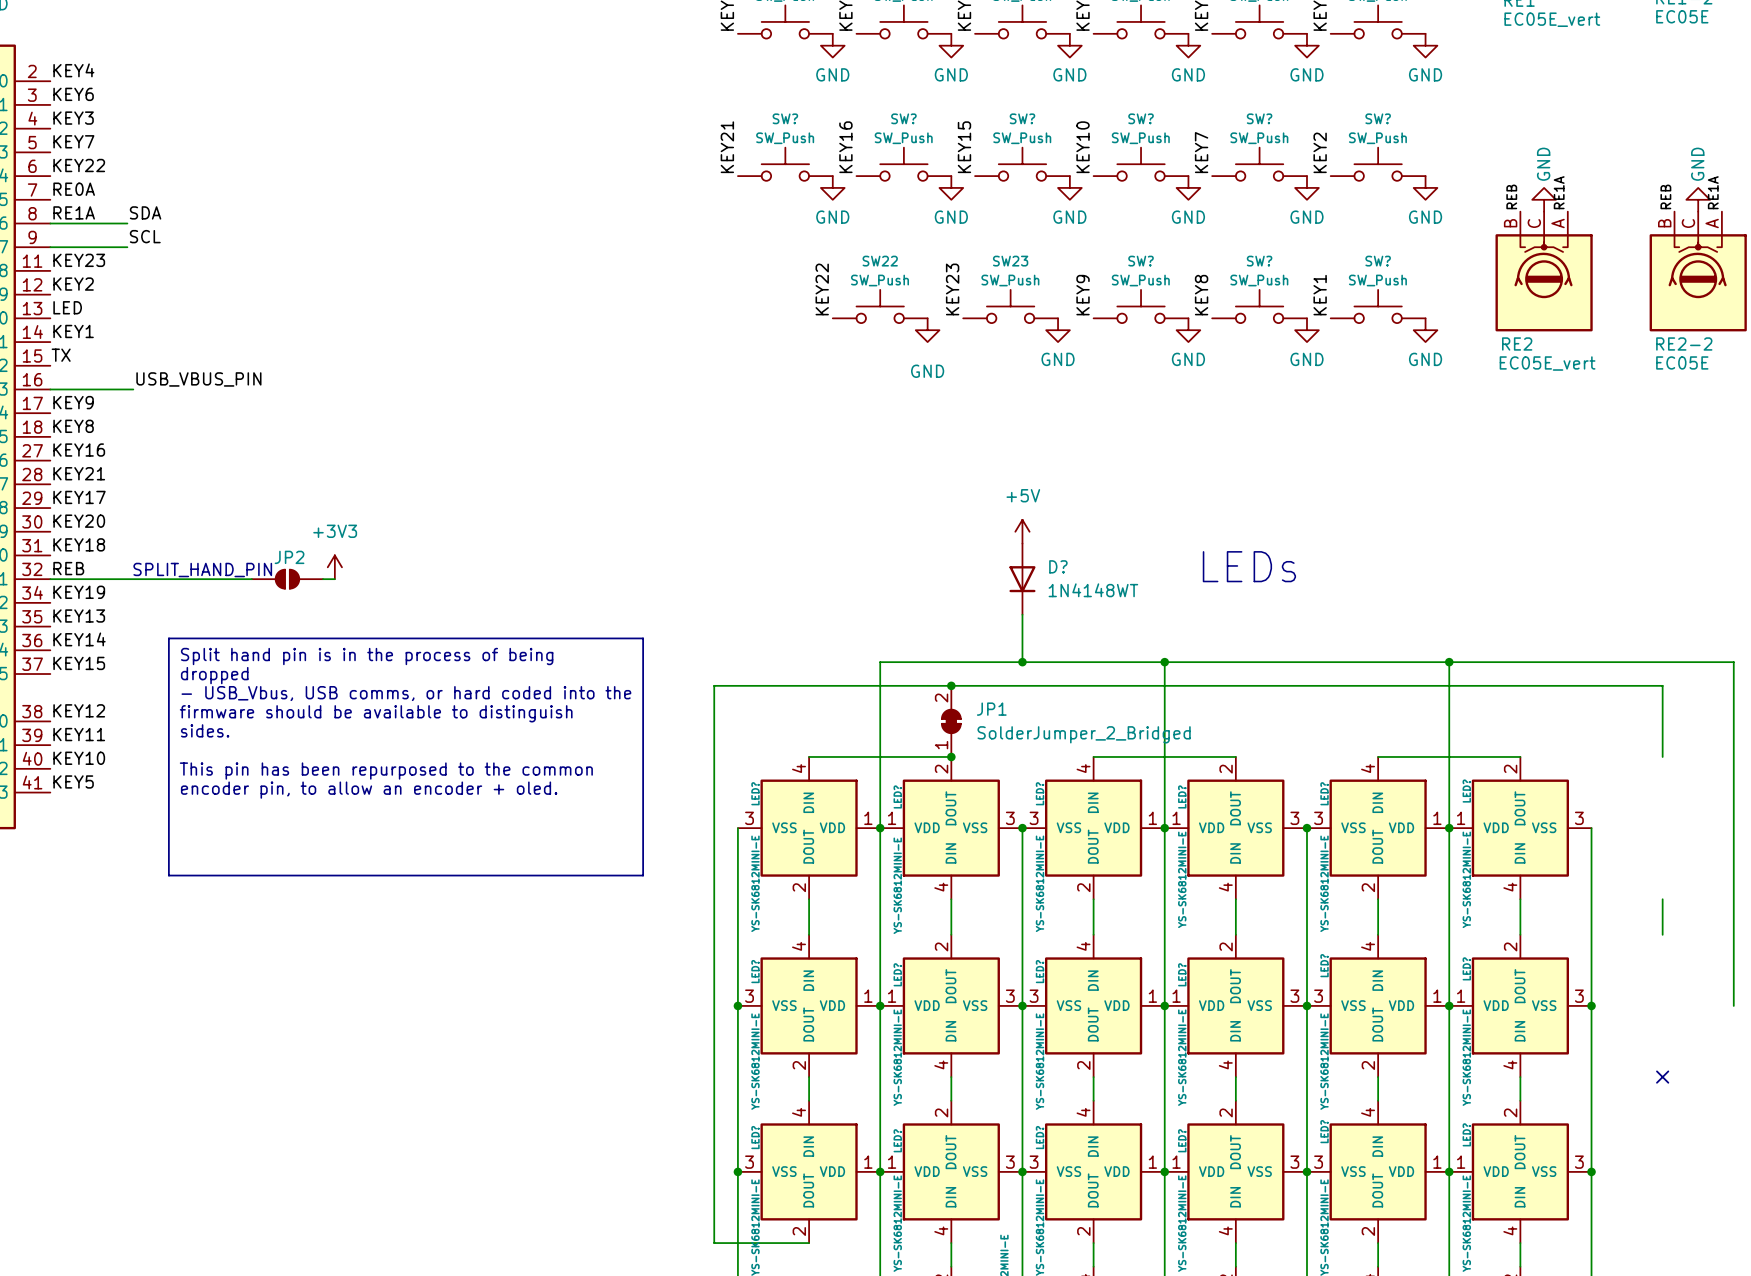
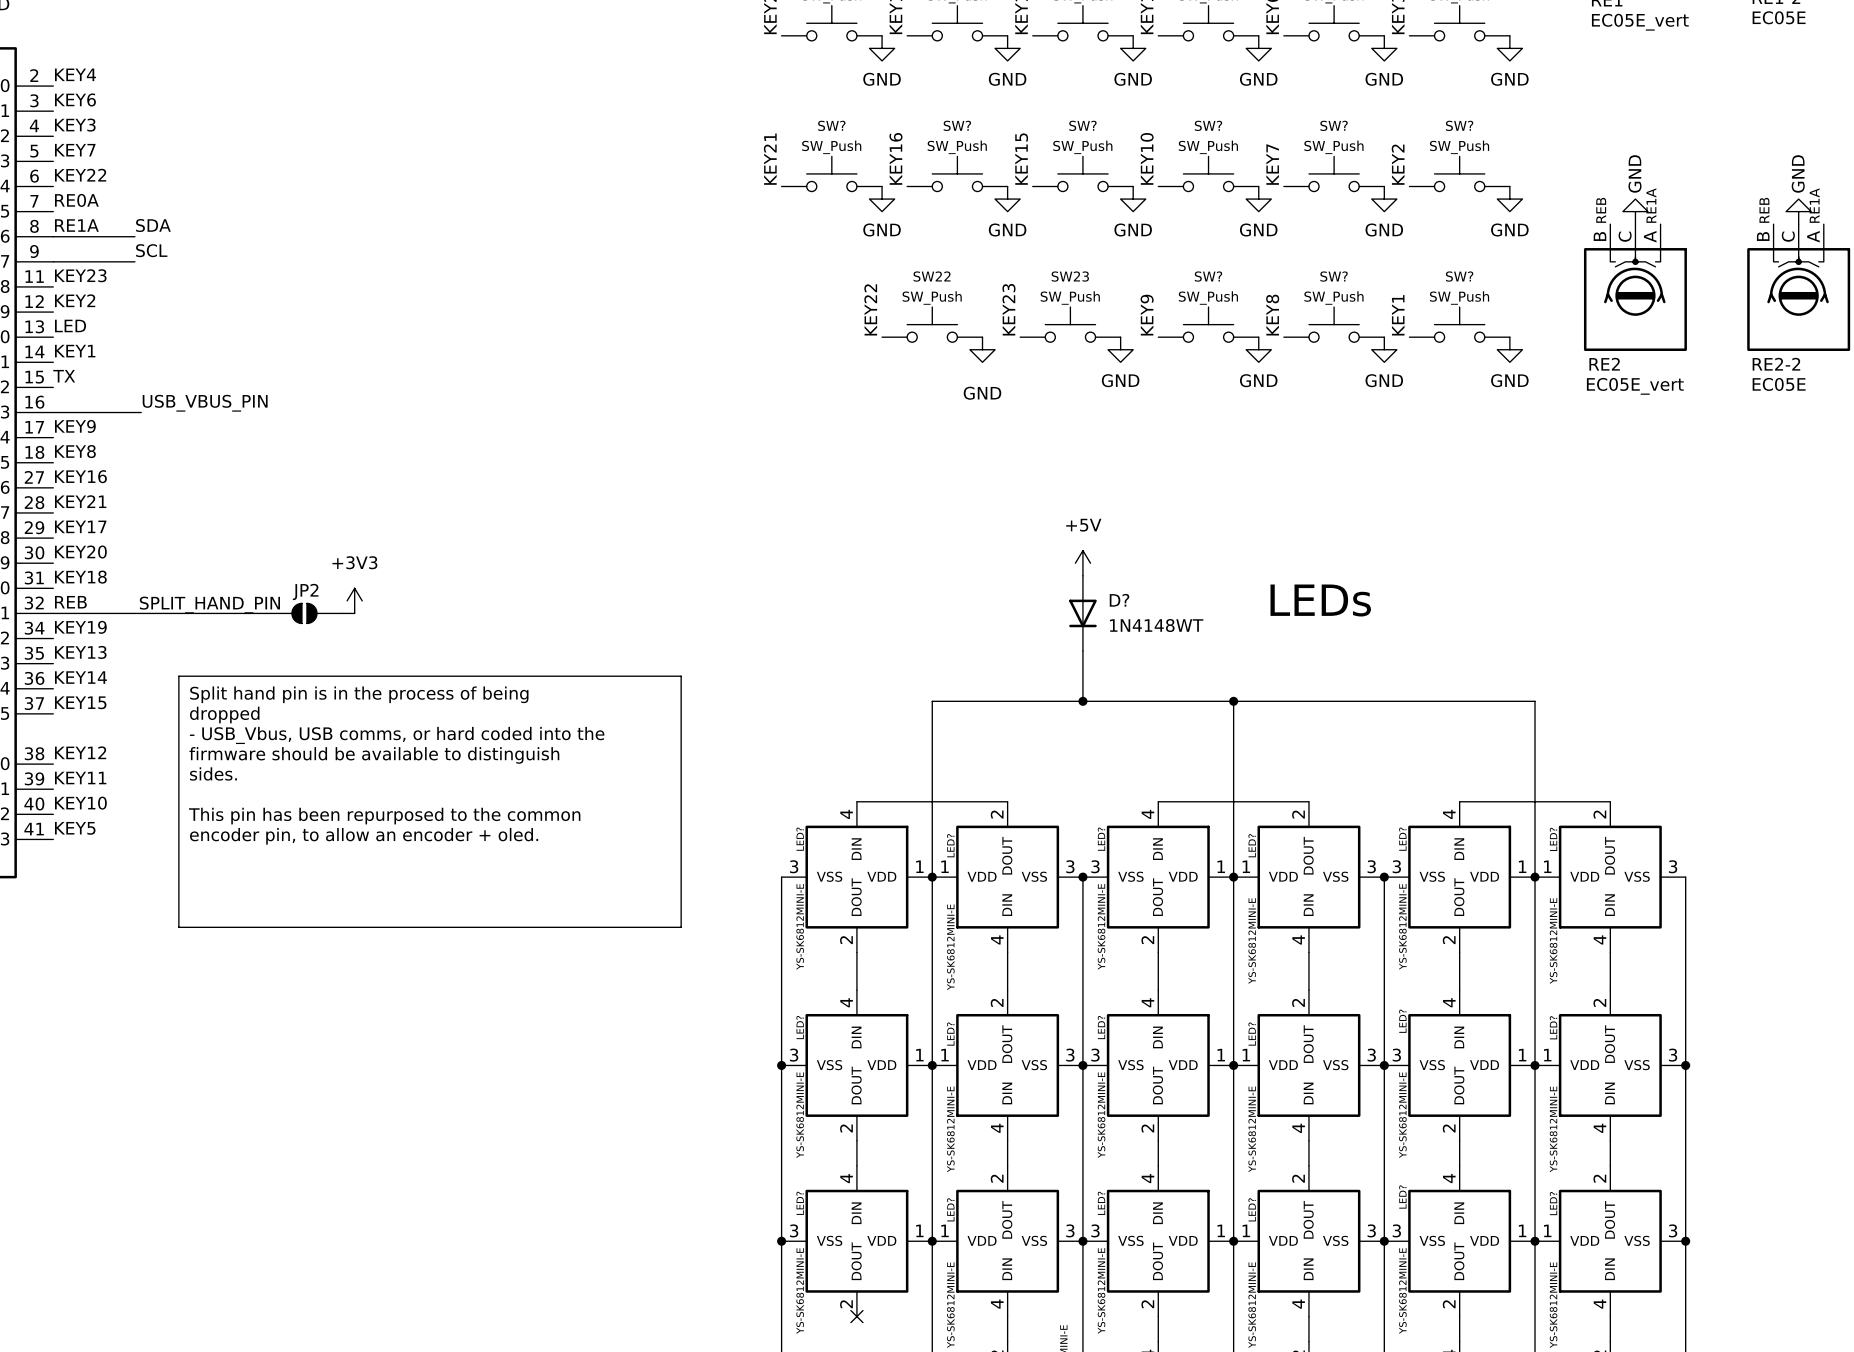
wire: (1449, 662) (1733, 662) (1733, 1005) -> none
junction: (1449, 662) -> none
junction: (951, 685) -> none
JP1: SolderJumper_2_Bridged (951, 721) -> none
junction: (951, 756) -> none
wire: (1662, 756) (1662, 685) (714, 685) (714, 1243) (809, 1243) -> none
wire: (1662, 899) (1662, 934) -> none
no-connect mark: (1662, 1077) -> none
no-connect mark: none -> (856, 1316)

